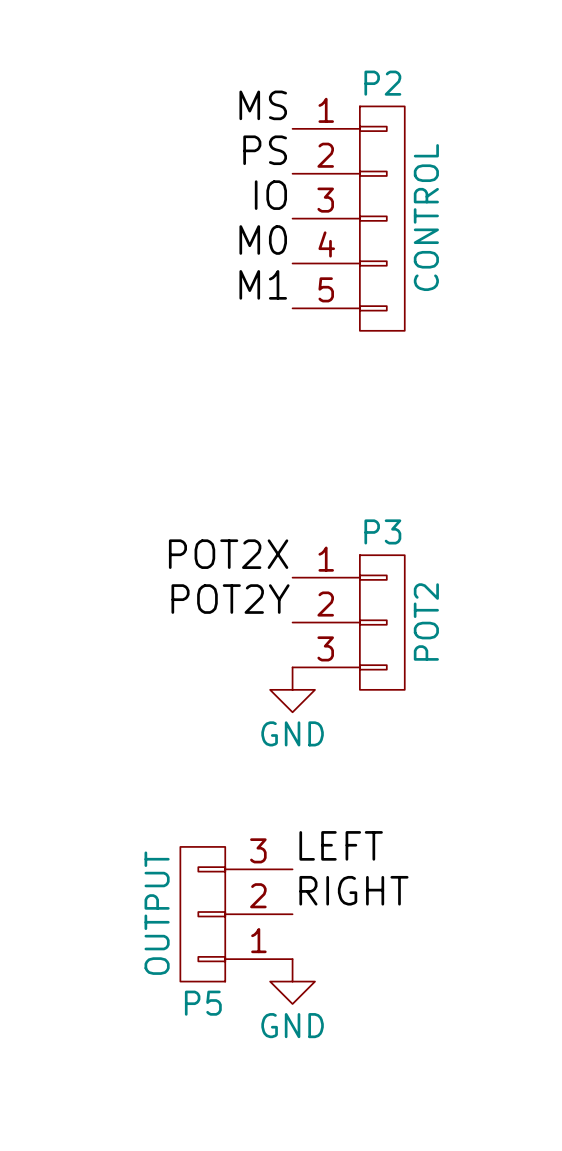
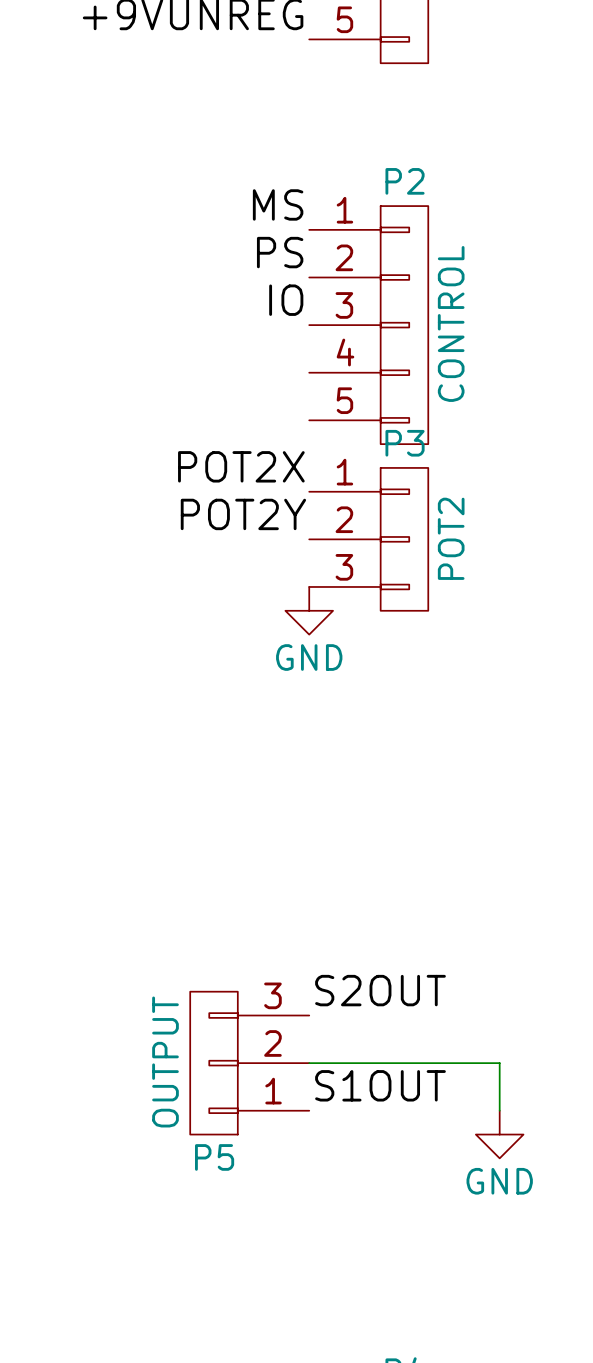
label: M0 (263, 240) -> none
label: M1 (263, 284) -> none
power symbol: none -> GND (309, 610)
label position: POT2X (228, 554) -> POT2X (241, 466)
label position: POT2Y (230, 599) -> POT2Y (243, 514)
P3 position: (348, 622) -> (368, 539)
power symbol: GND (292, 689) -> none
label: LEFT (341, 845) -> S2OUT (380, 990)
label: RIGHT (353, 890) -> none
wire: none -> (309, 1063) (499, 1063) (499, 1110)
label: none -> S1OUT (380, 1085)
power symbol: GND (292, 981) -> none
power symbol: none -> GND (499, 1134)

